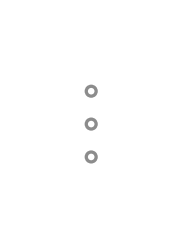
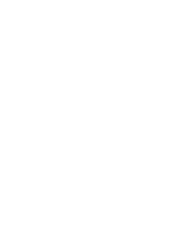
part: (91, 124) -> none

